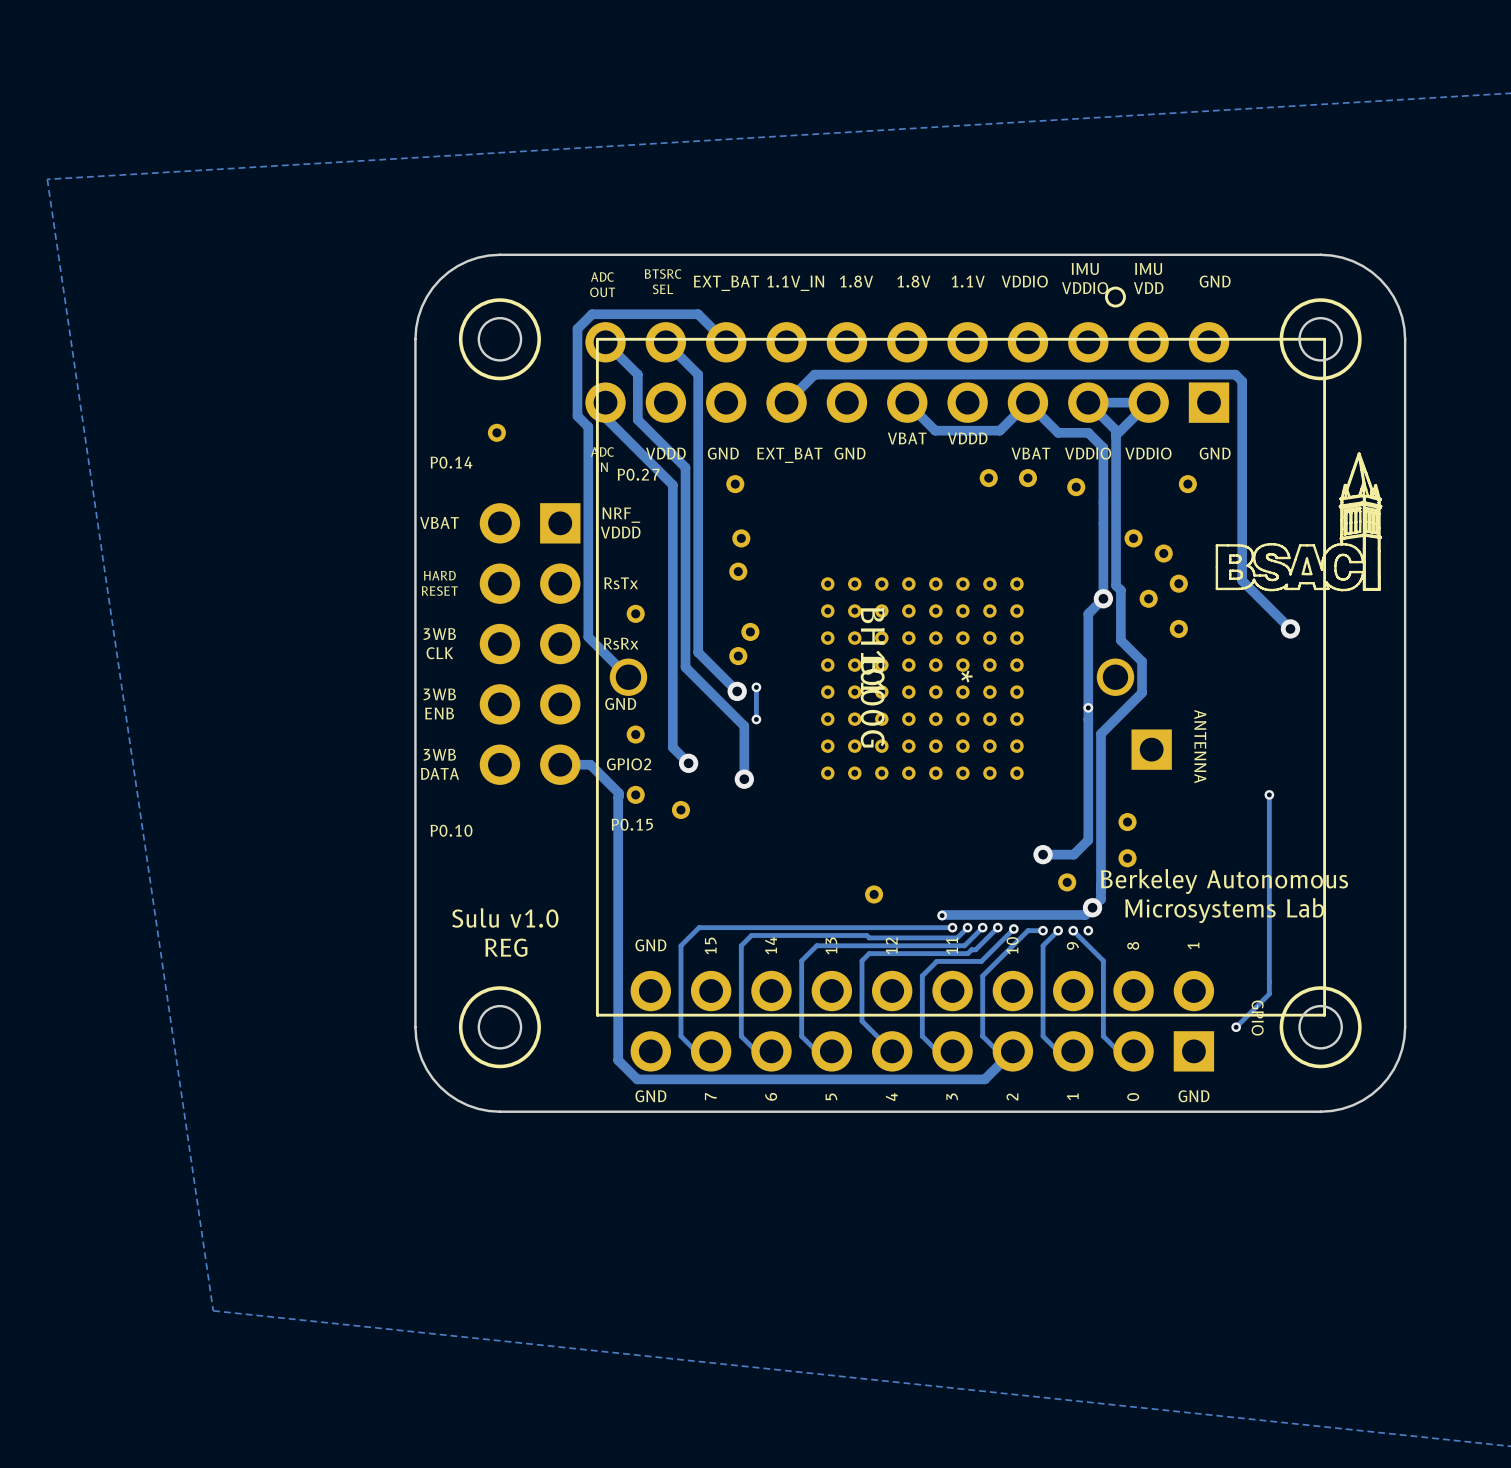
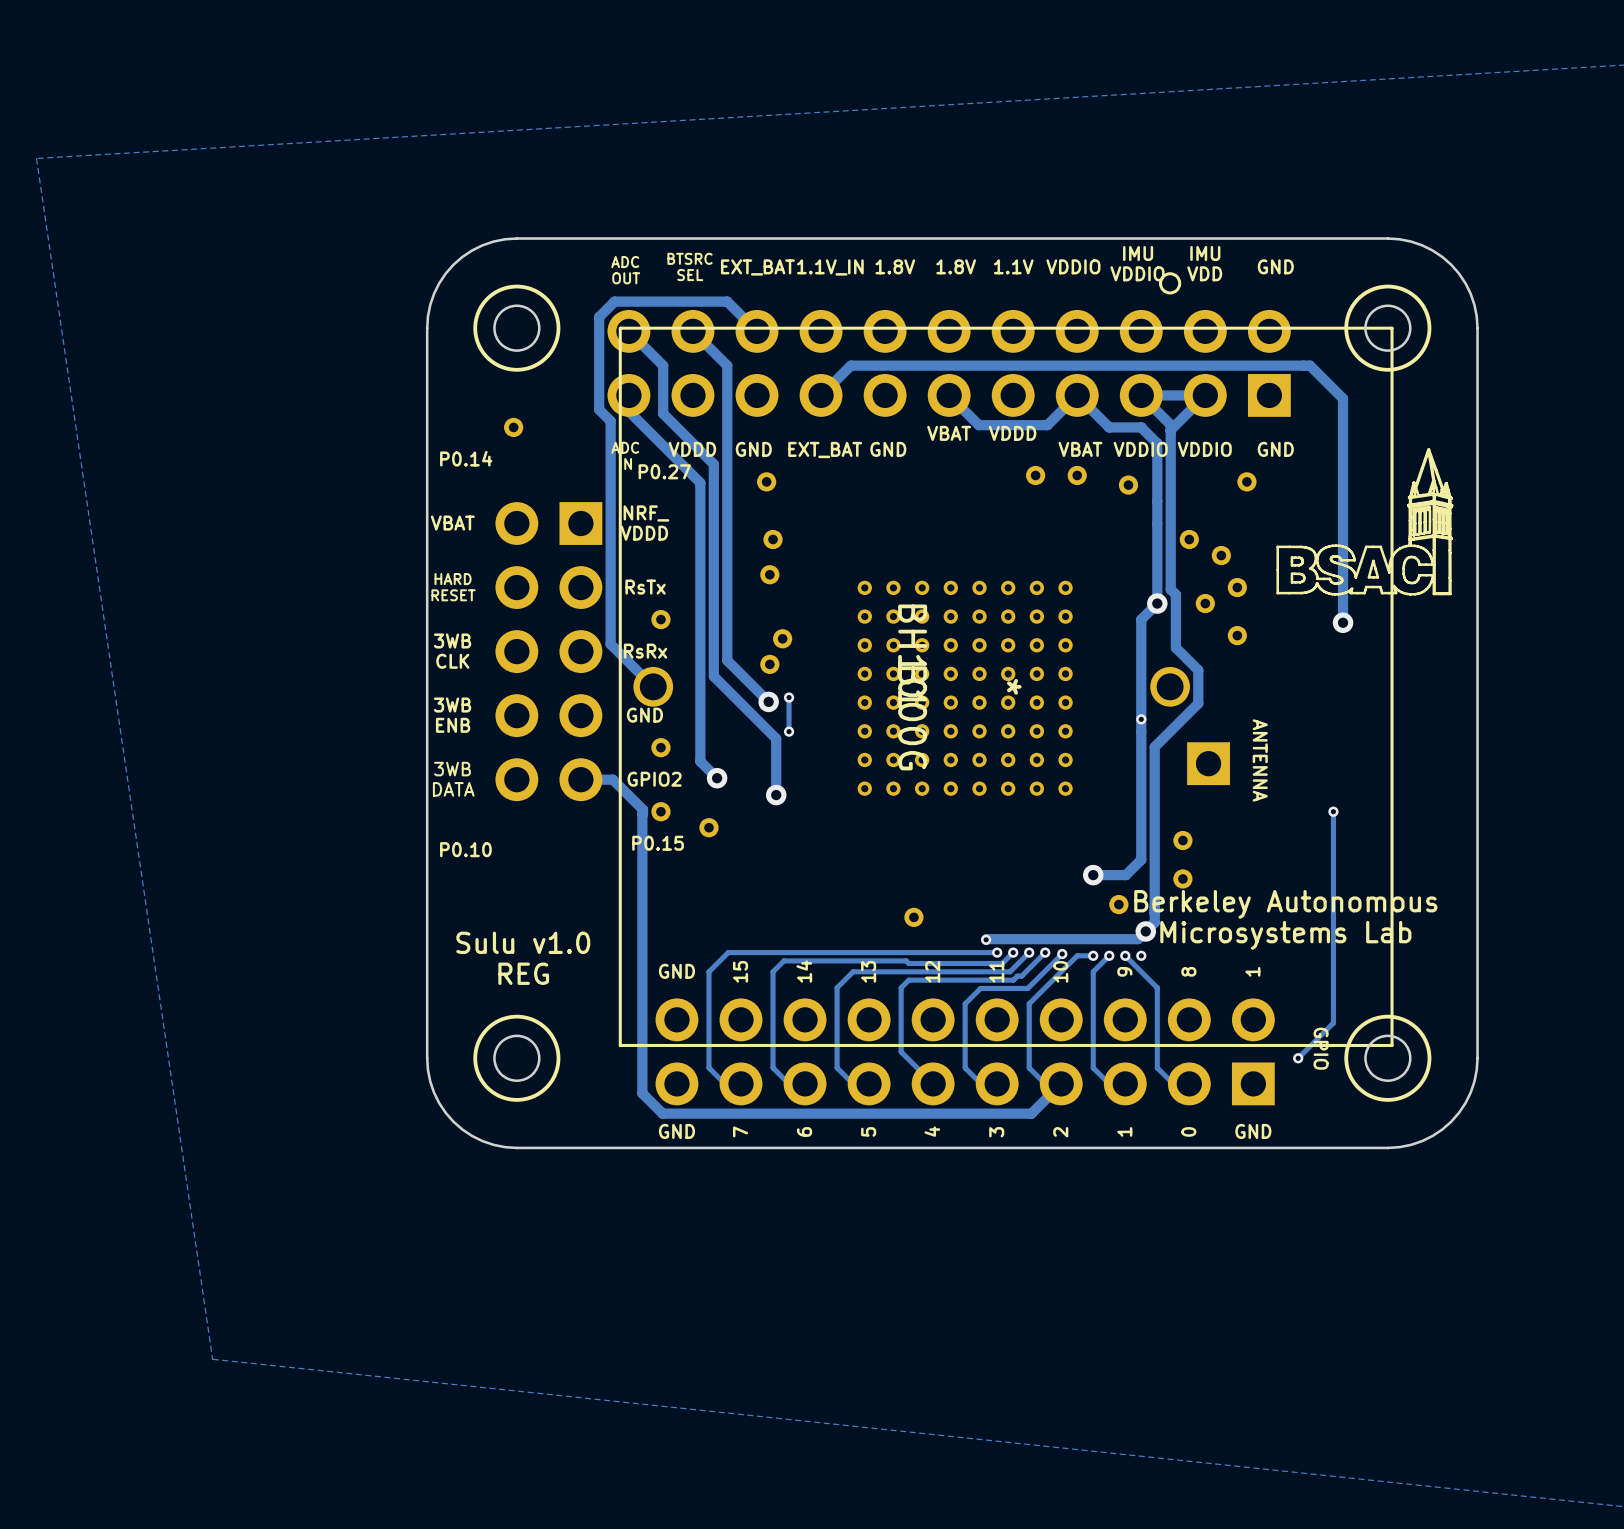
track: (1235, 374) (1242, 381) (1242, 580) (1290, 628) -> (1297, 365) (1310, 365) (1343, 398) (1343, 622)
via position: (1290, 628) -> (1343, 622)

